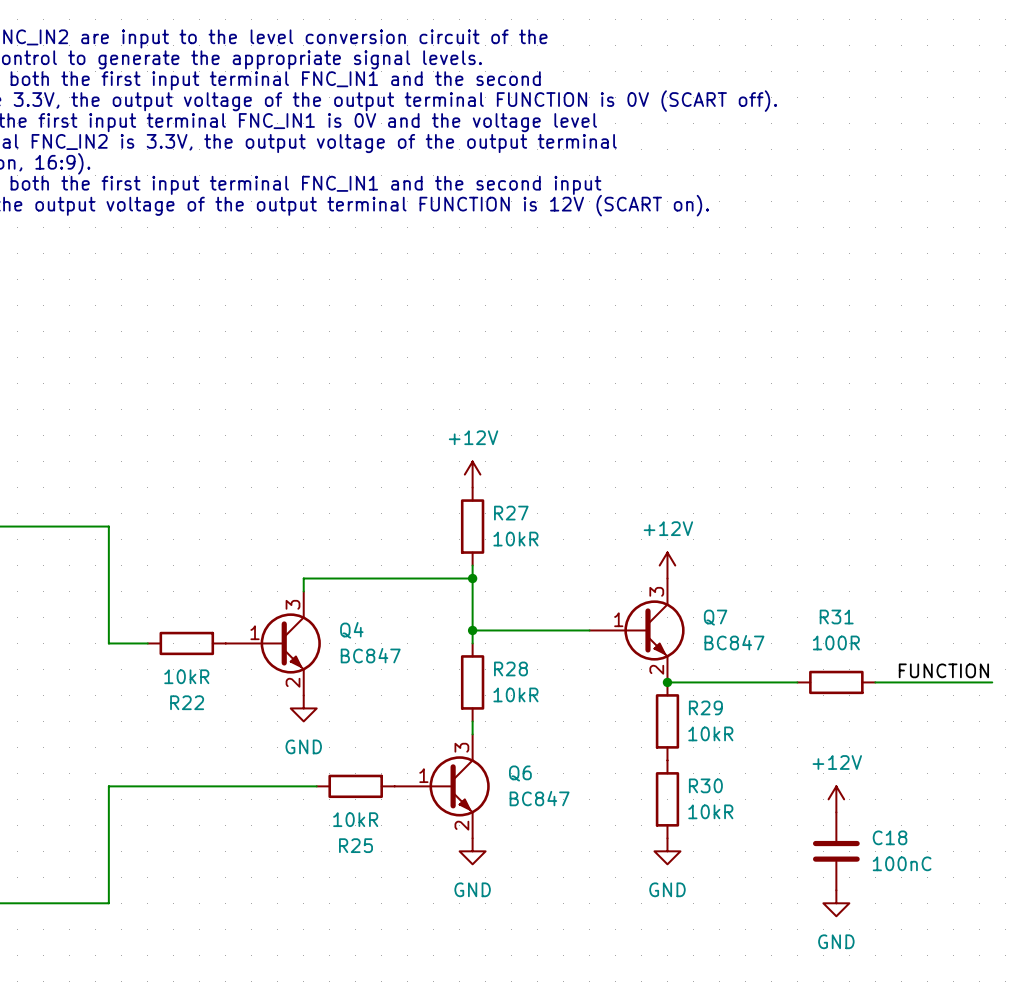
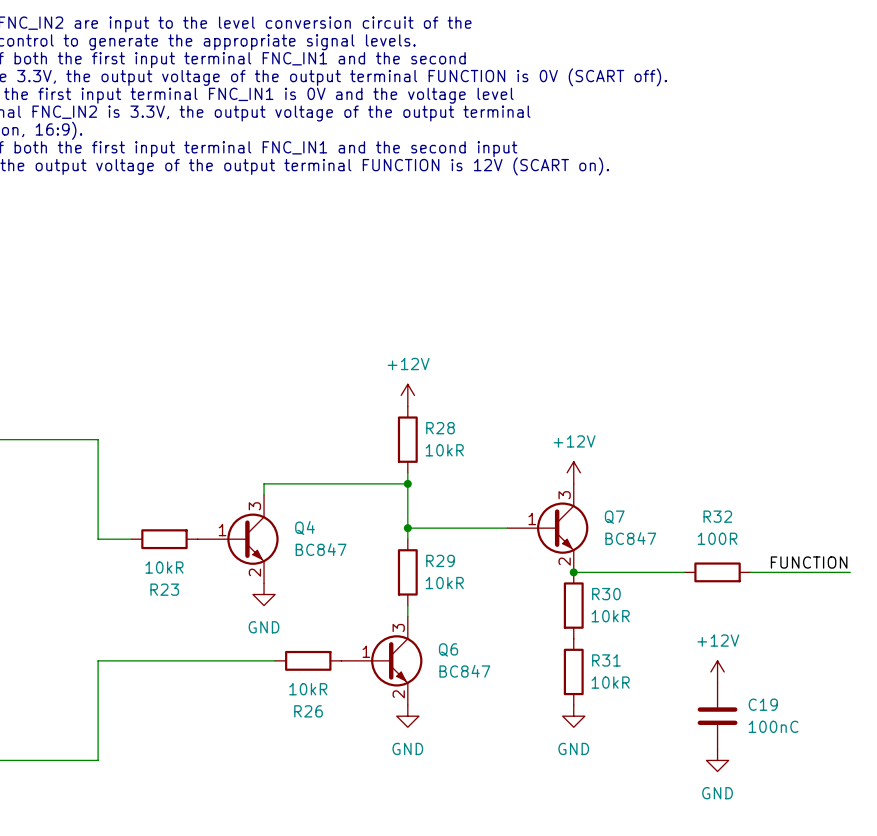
R27 name: R27 (511, 513) -> R28 (440, 428)
R31 name: R31 (836, 617) -> R32 (717, 516)
R28 name: R28 (511, 668) -> R29 (440, 560)
R22 name: R22 (187, 702) -> R23 (164, 589)
R29 name: R29 (705, 707) -> R30 (606, 594)
R30 name: R30 (705, 785) -> R31 (606, 660)
C18 name: C18 (890, 837) -> C19 (763, 704)
R25 name: R25 (356, 845) -> R26 (308, 711)

